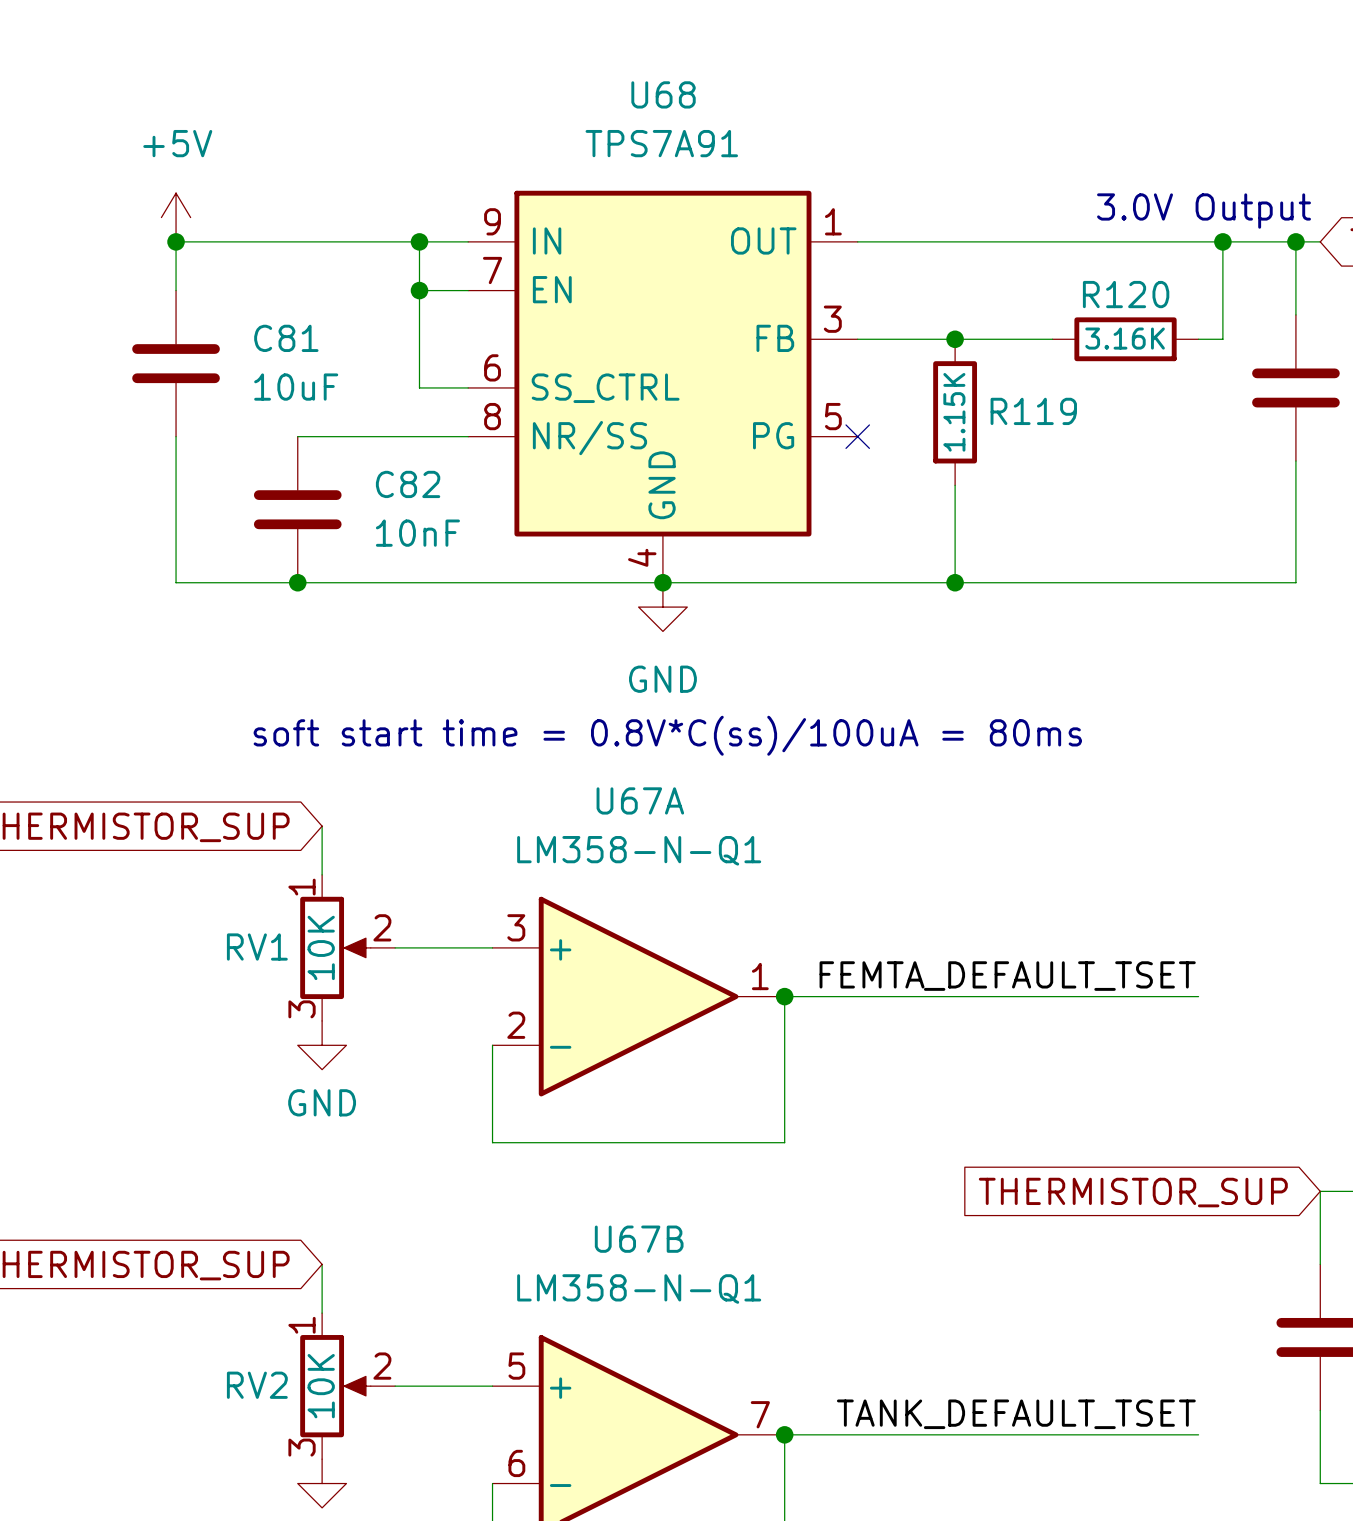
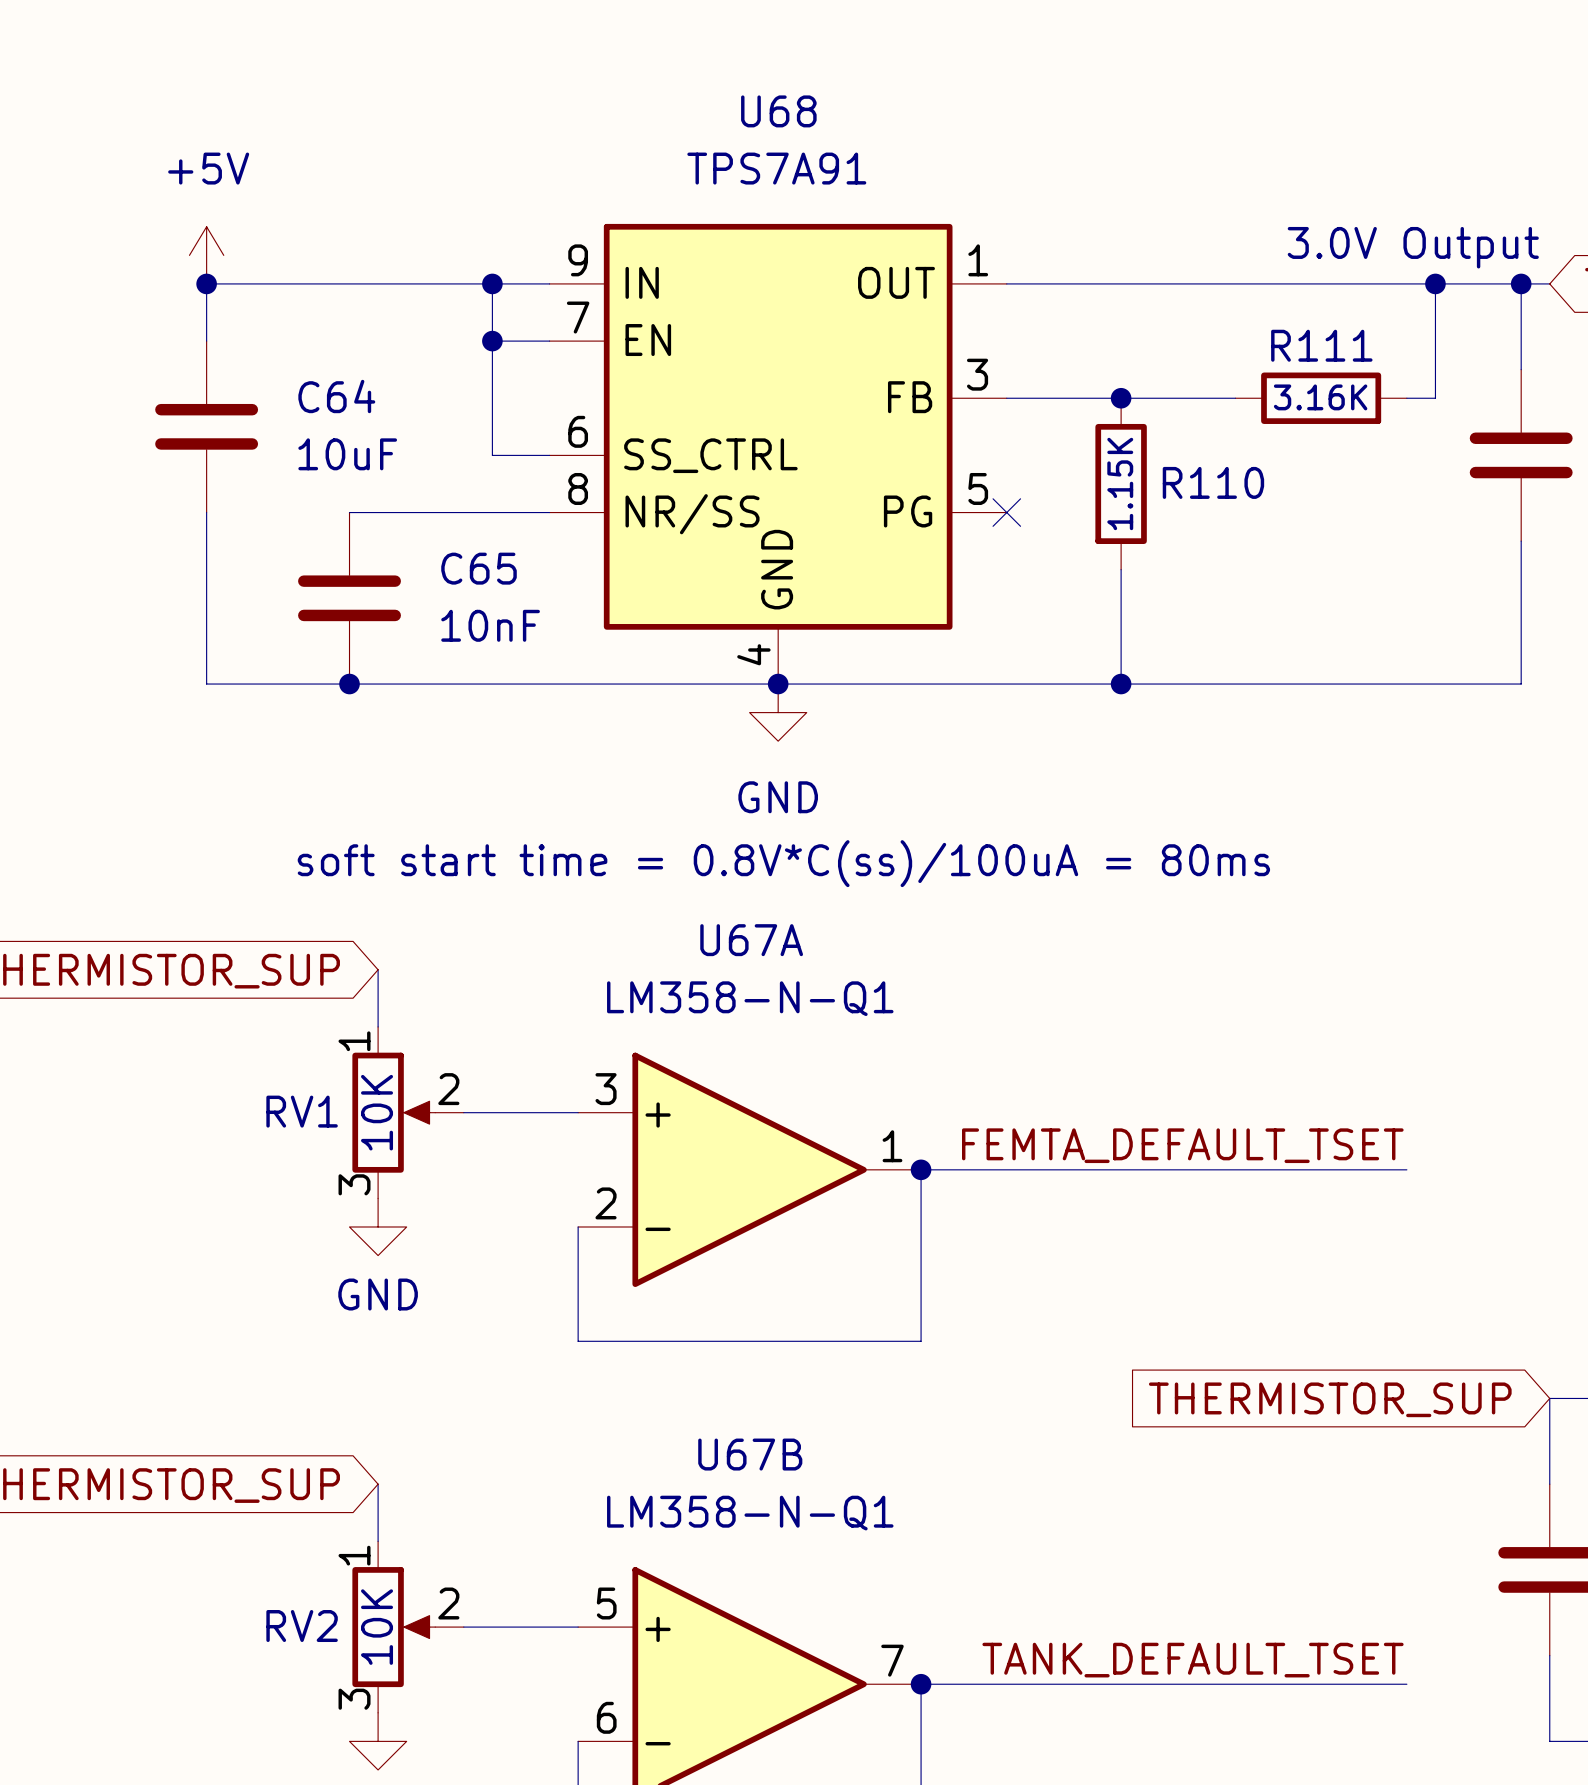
R120 name: R120 (1126, 294) -> R111 (1321, 345)
C81 name: C81 (286, 338) -> C64 (336, 396)
R119 name: R119 (1033, 411) -> R110 (1213, 482)
C82 name: C82 (408, 484) -> C65 (479, 568)

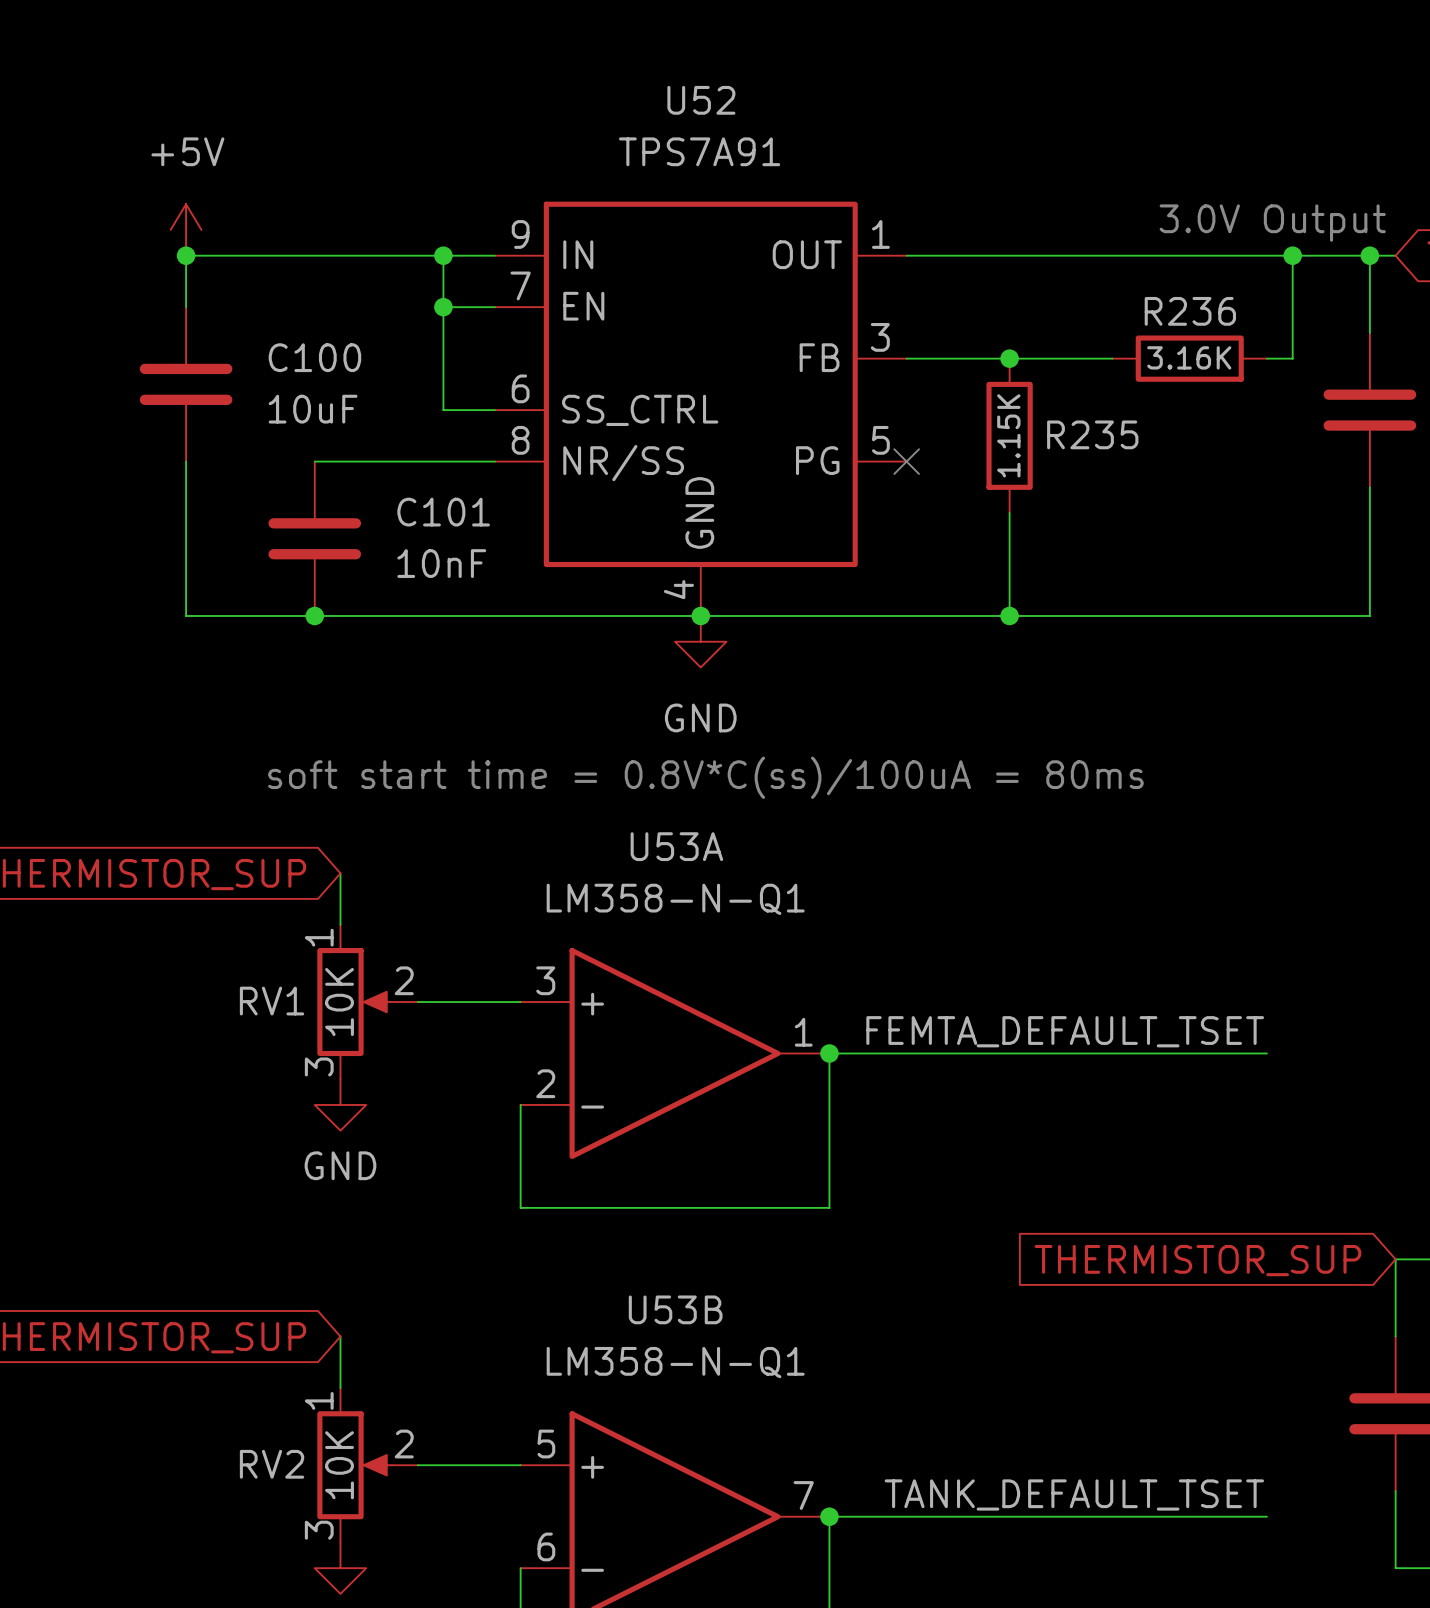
U68 name: U68 (778, 111) -> U52 (701, 100)
R111 name: R111 (1321, 345) -> R236 (1190, 311)
C64 name: C64 (336, 396) -> C100 (314, 357)
R110 name: R110 (1213, 482) -> R235 (1092, 434)
C65 name: C65 (479, 568) -> C101 (443, 512)
U67A name: U67A (751, 940) -> U53A (676, 846)
U67B name: U67B (750, 1454) -> U53B (675, 1309)

